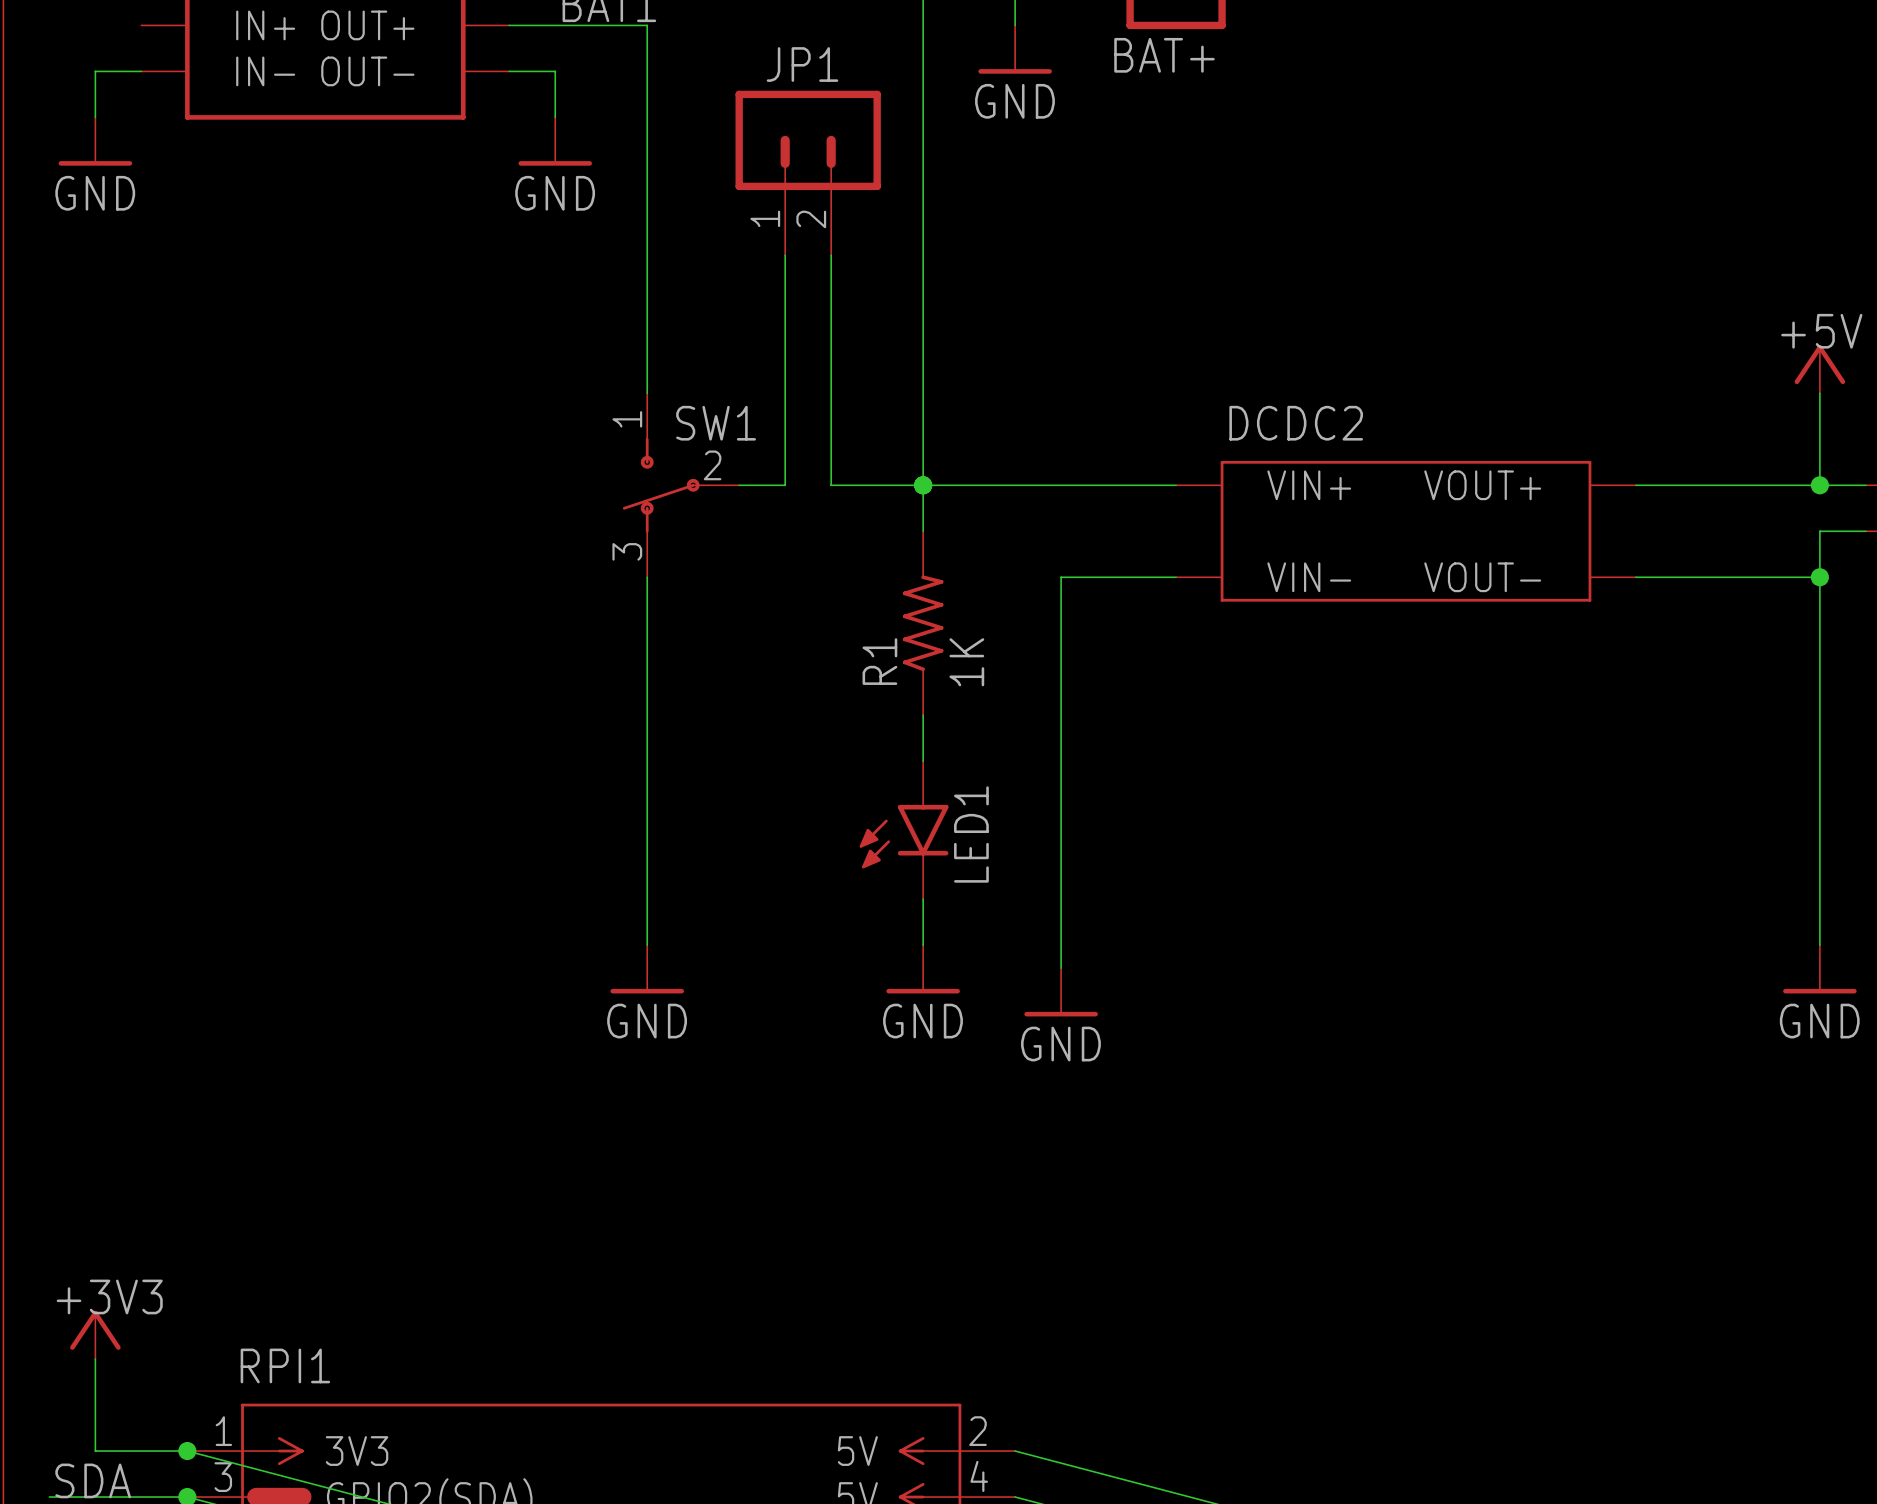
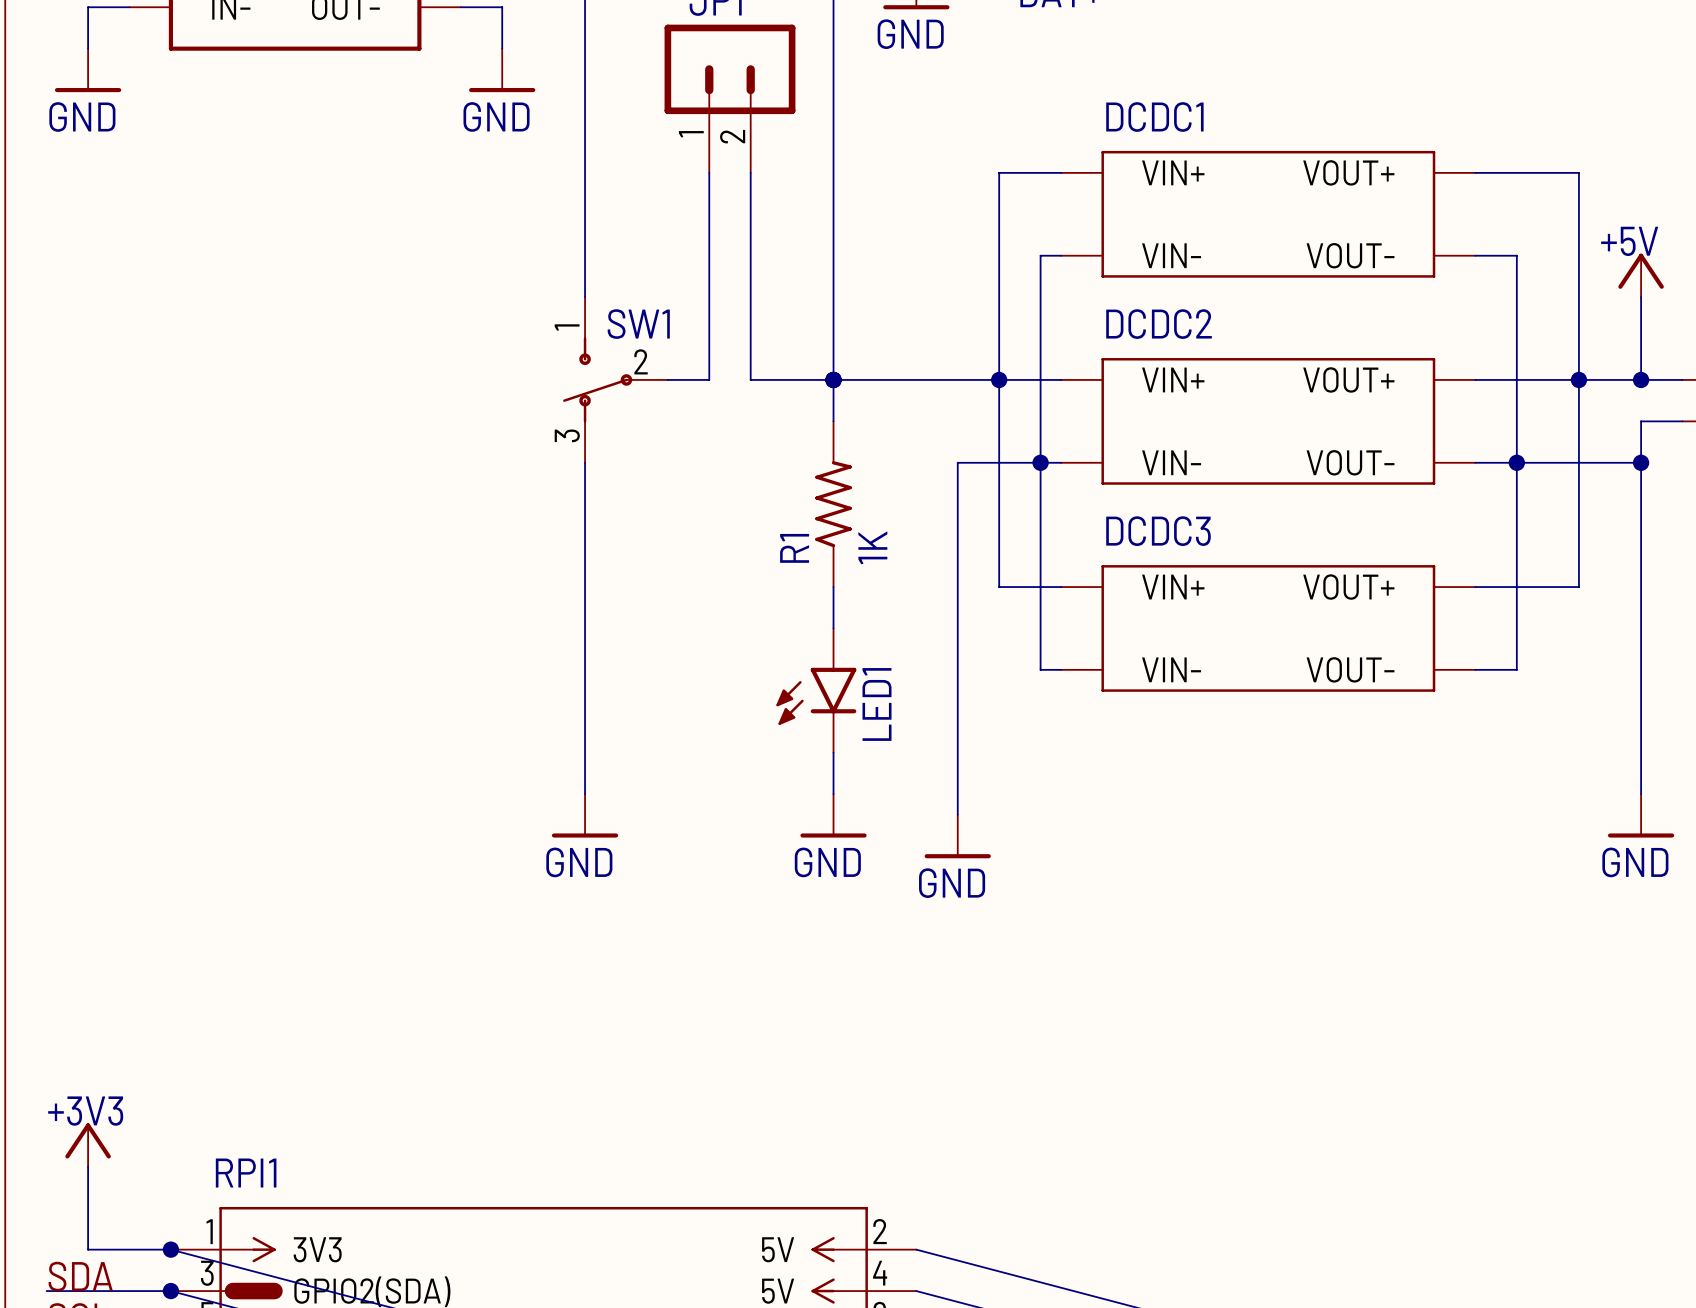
wire: none -> (1061, 172) (999, 172) (999, 587) (1061, 587)
wire: none -> (1475, 172) (1578, 172) (1578, 587) (1475, 587)
DCDC1: none -> (1268, 214)
wire: none -> (1061, 255) (1040, 255) (1040, 669) (1061, 669)
wire: none -> (1475, 255) (1516, 255) (1516, 669) (1475, 669)
junction: none -> (999, 379)
junction: none -> (1578, 379)
junction: none -> (1040, 462)
junction: none -> (1516, 462)
DCDC3: none -> (1268, 628)

